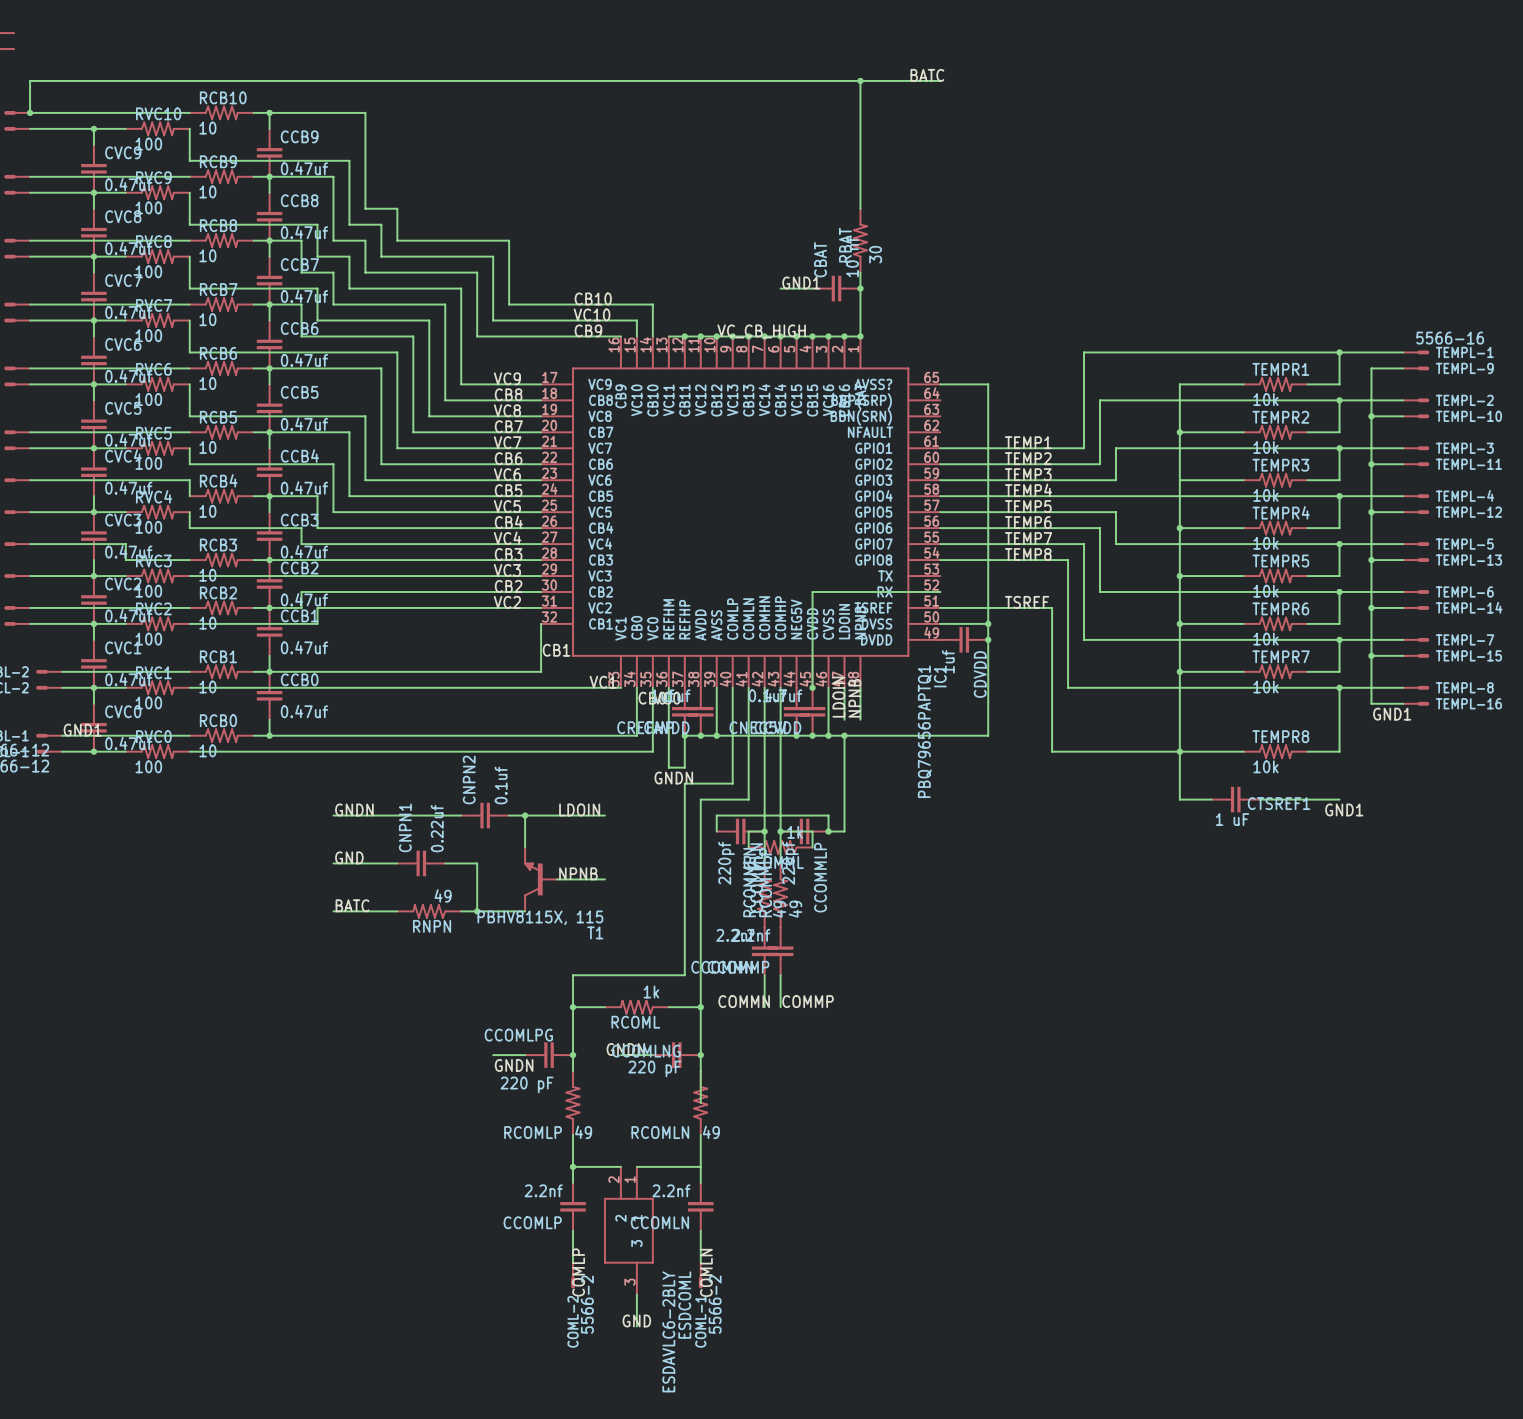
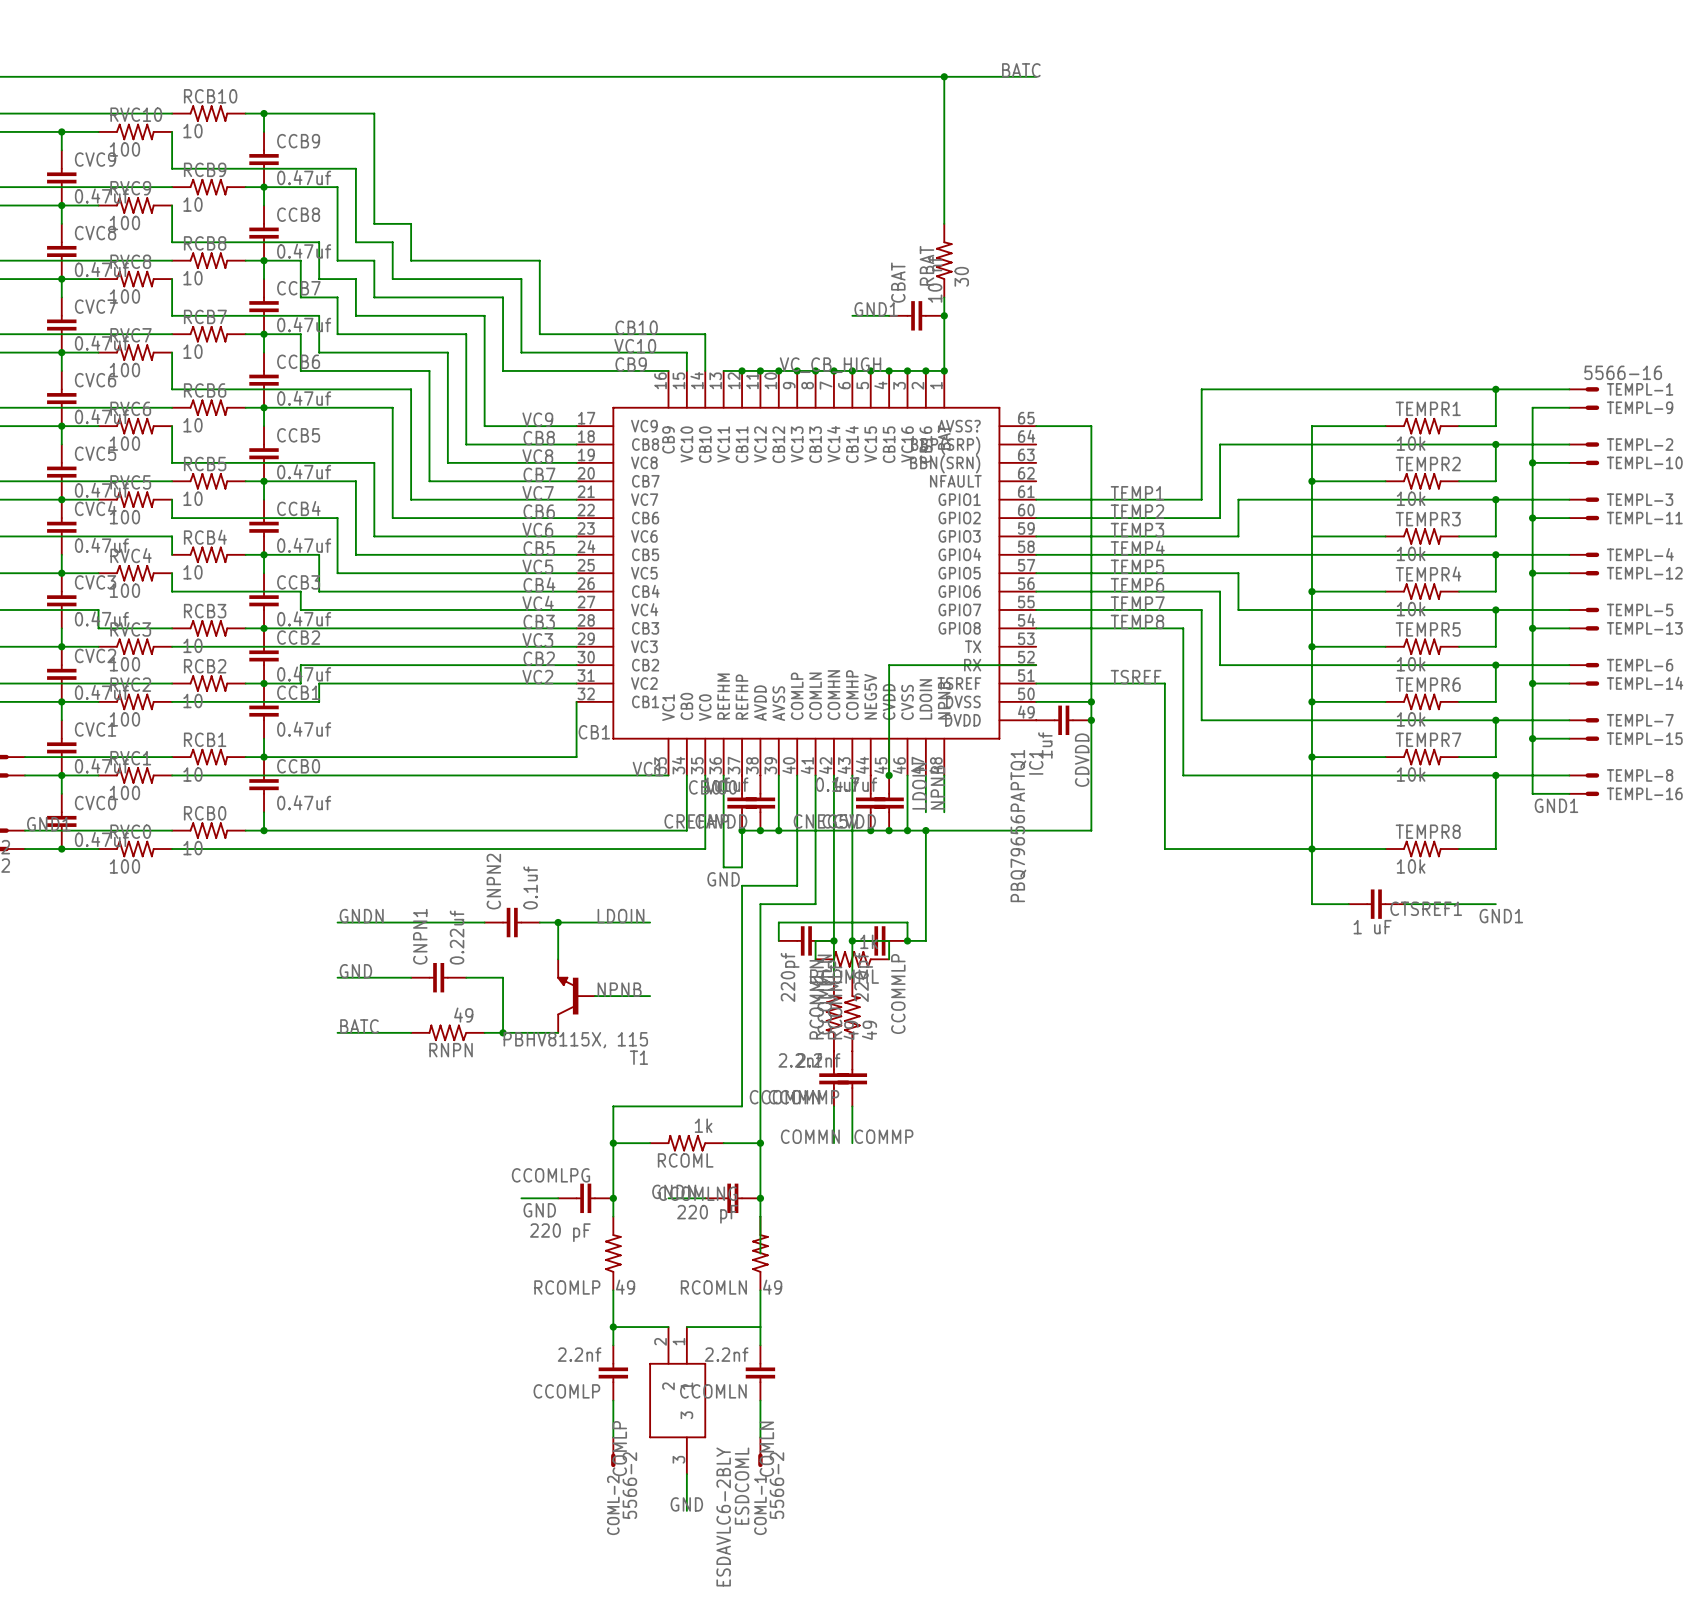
label: GNDN (673, 778) -> GND (723, 879)
label: GNDN (514, 1065) -> GND (539, 1210)

